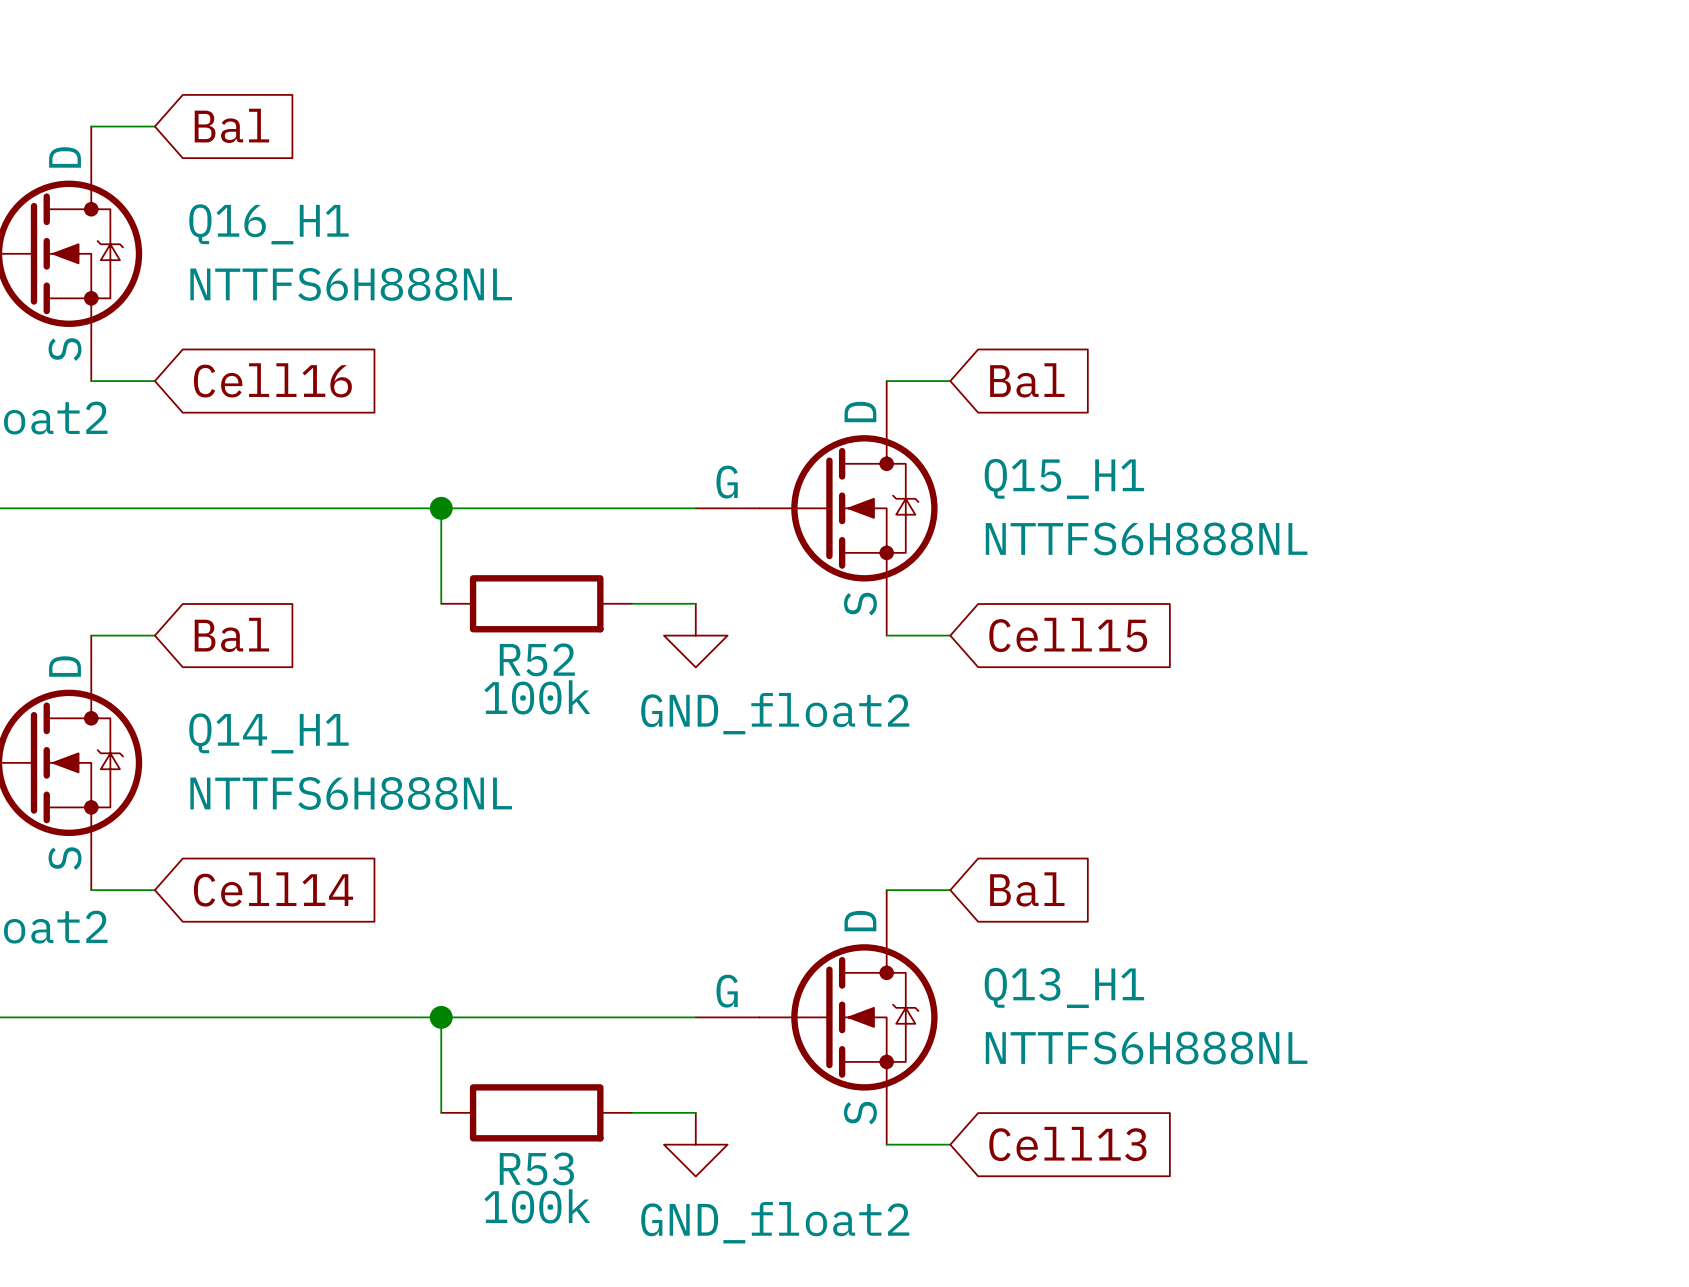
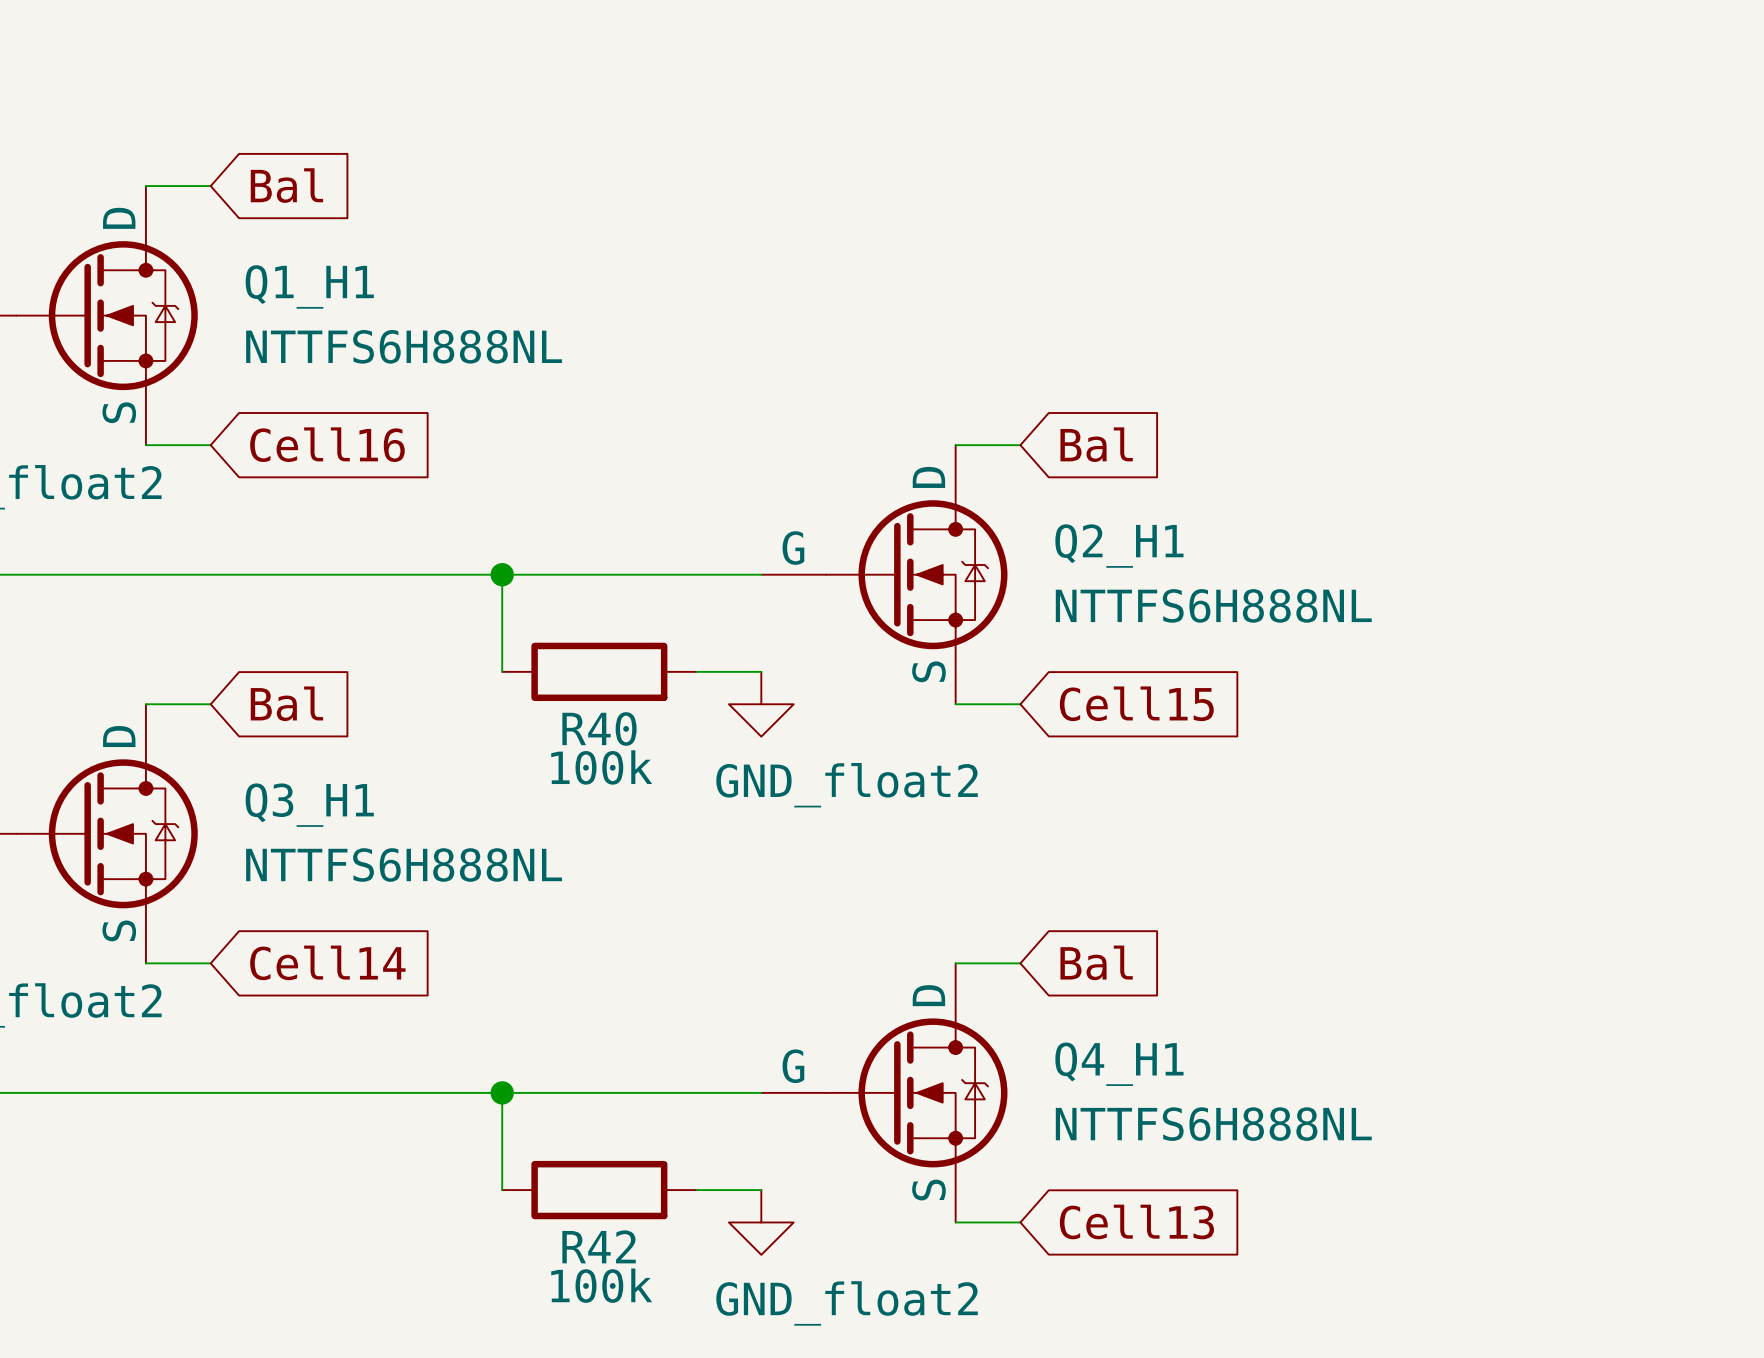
Q16_H1 name: Q16_H1 (268, 224) -> Q1_H1 (309, 286)
Q15_H1 name: Q15_H1 (1064, 478) -> Q2_H1 (1119, 546)
R52 name: R52 (537, 659) -> R40 (599, 728)
Q14_H1 name: Q14_H1 (268, 733) -> Q3_H1 (309, 805)
Q13_H1 name: Q13_H1 (1064, 987) -> Q4_H1 (1119, 1064)
R53 name: R53 (536, 1168) -> R42 (599, 1246)

